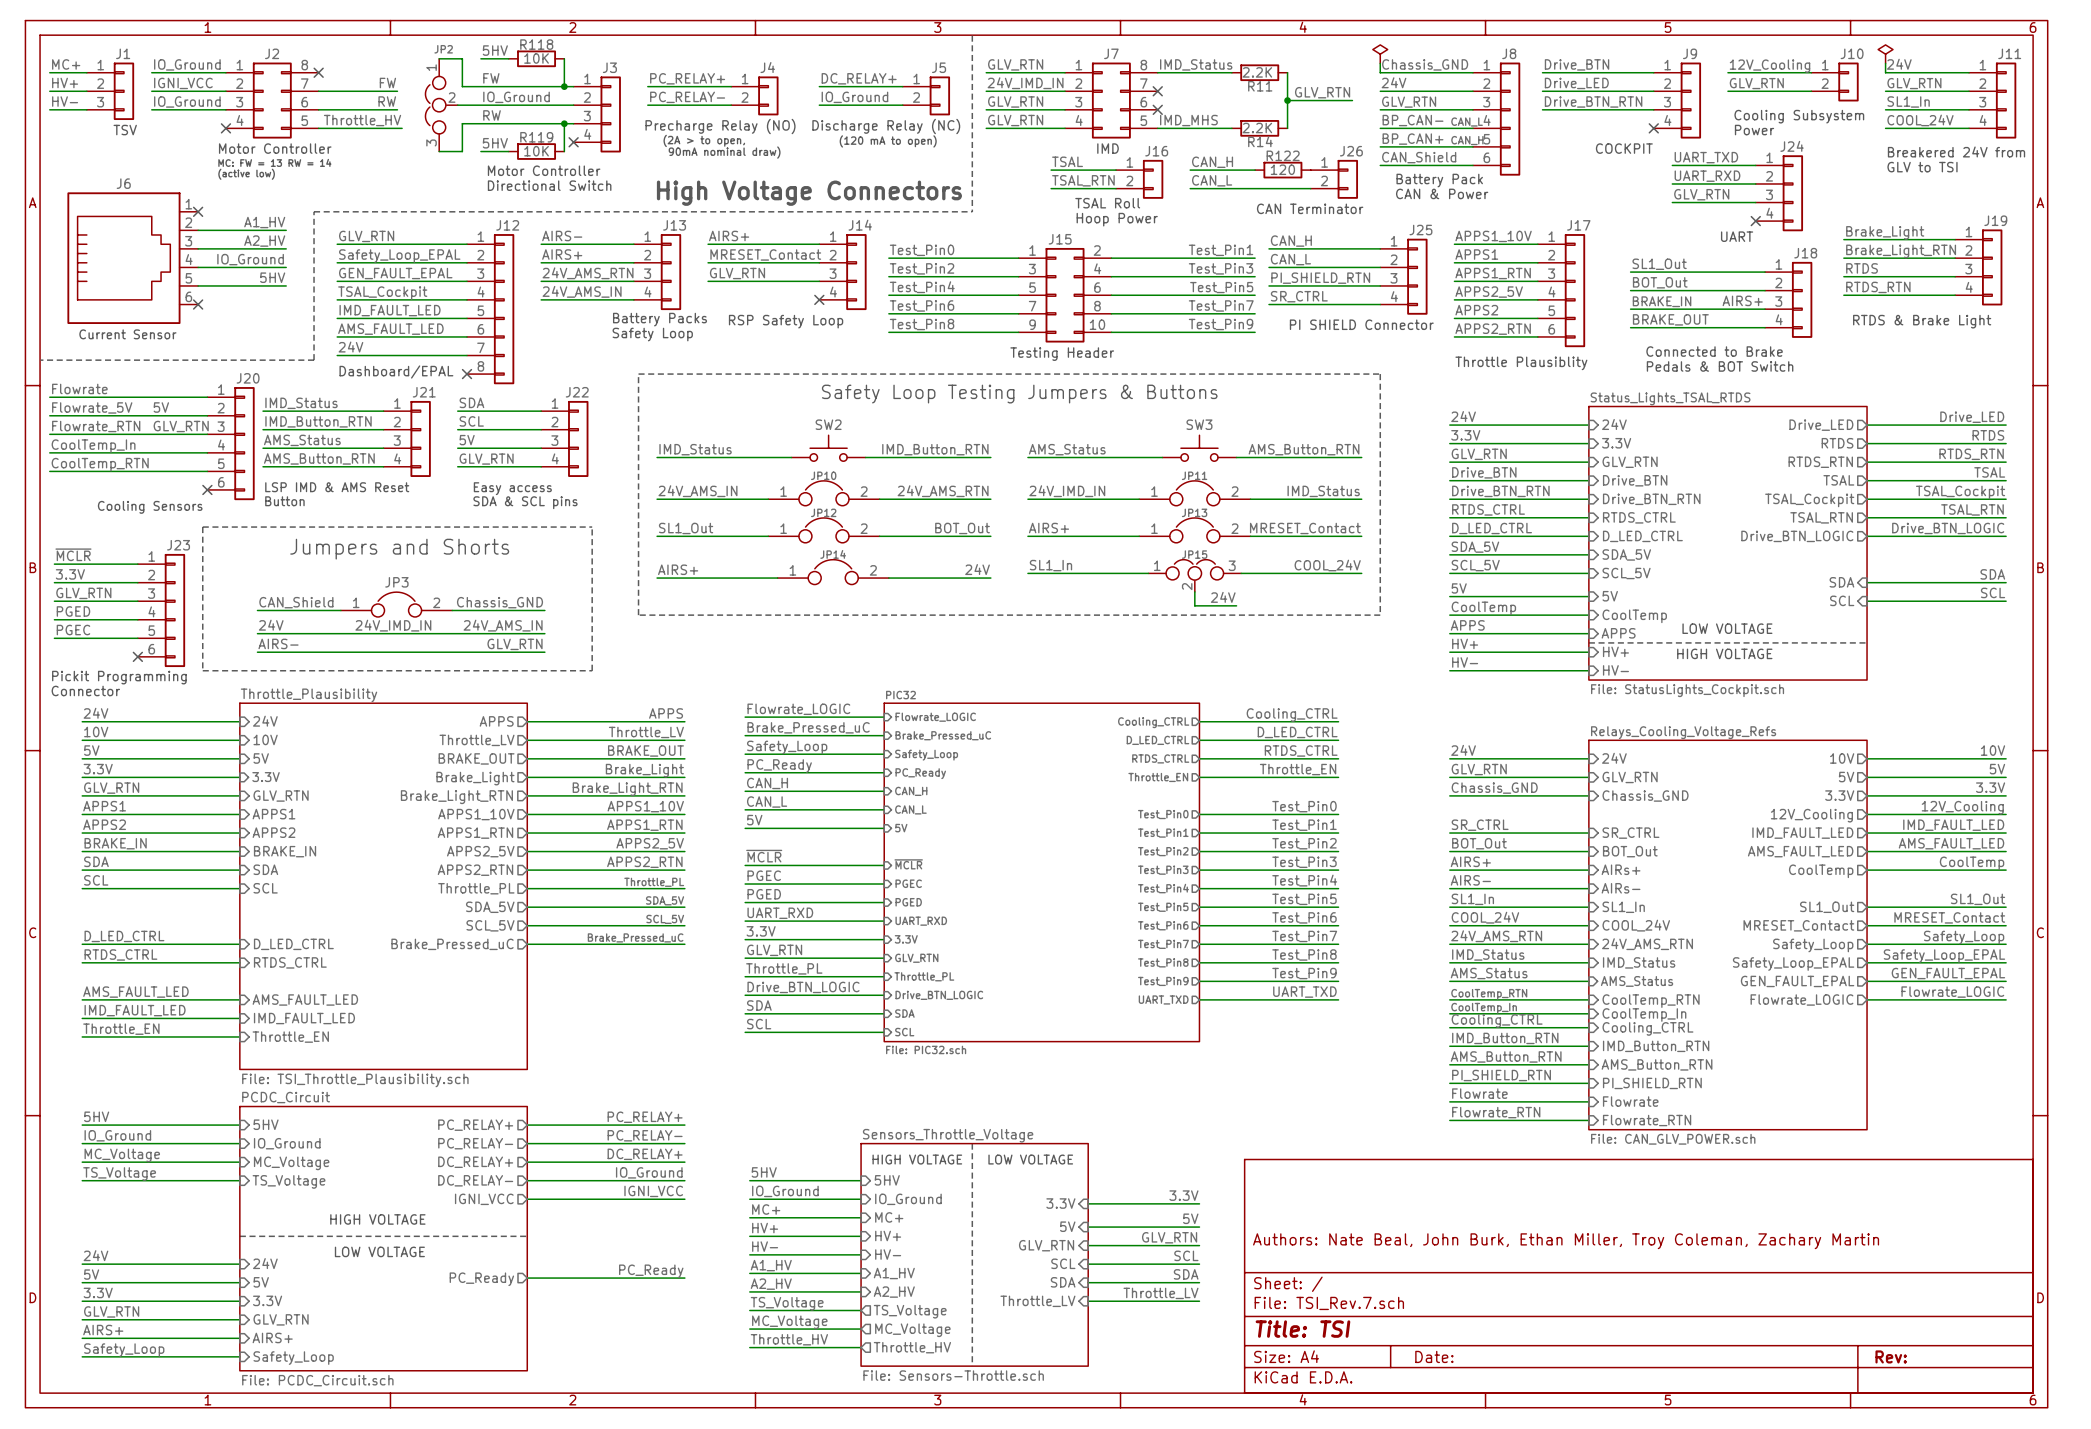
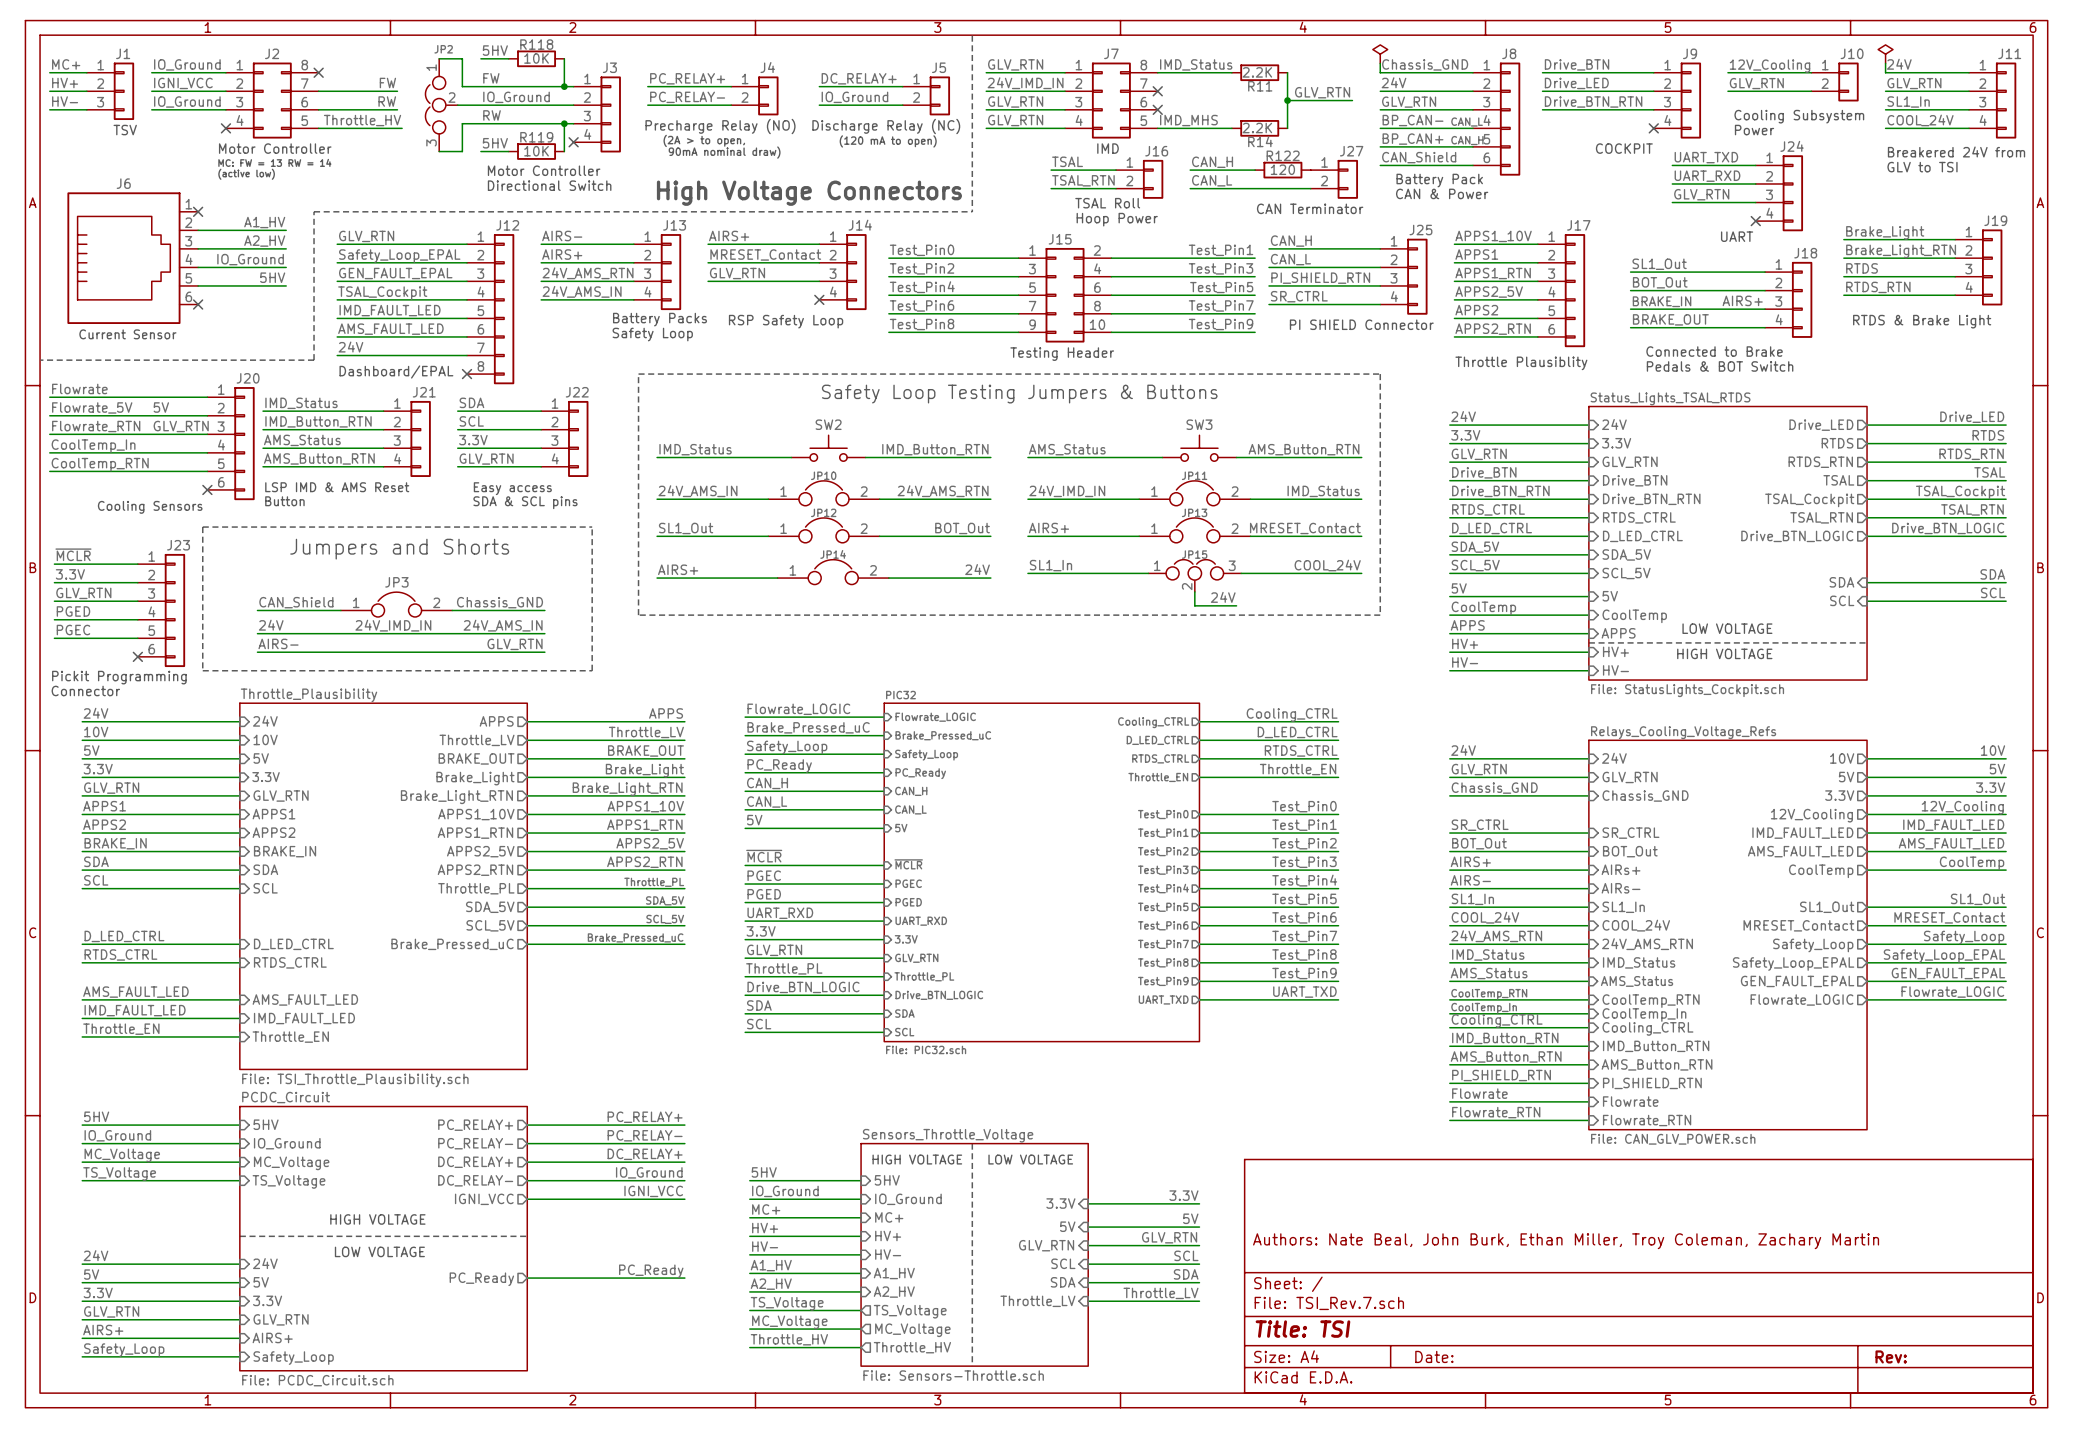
J26 name: J26 (1351, 151) -> J27 (1351, 151)
label: 5V (467, 440) -> 3.3V (473, 440)

